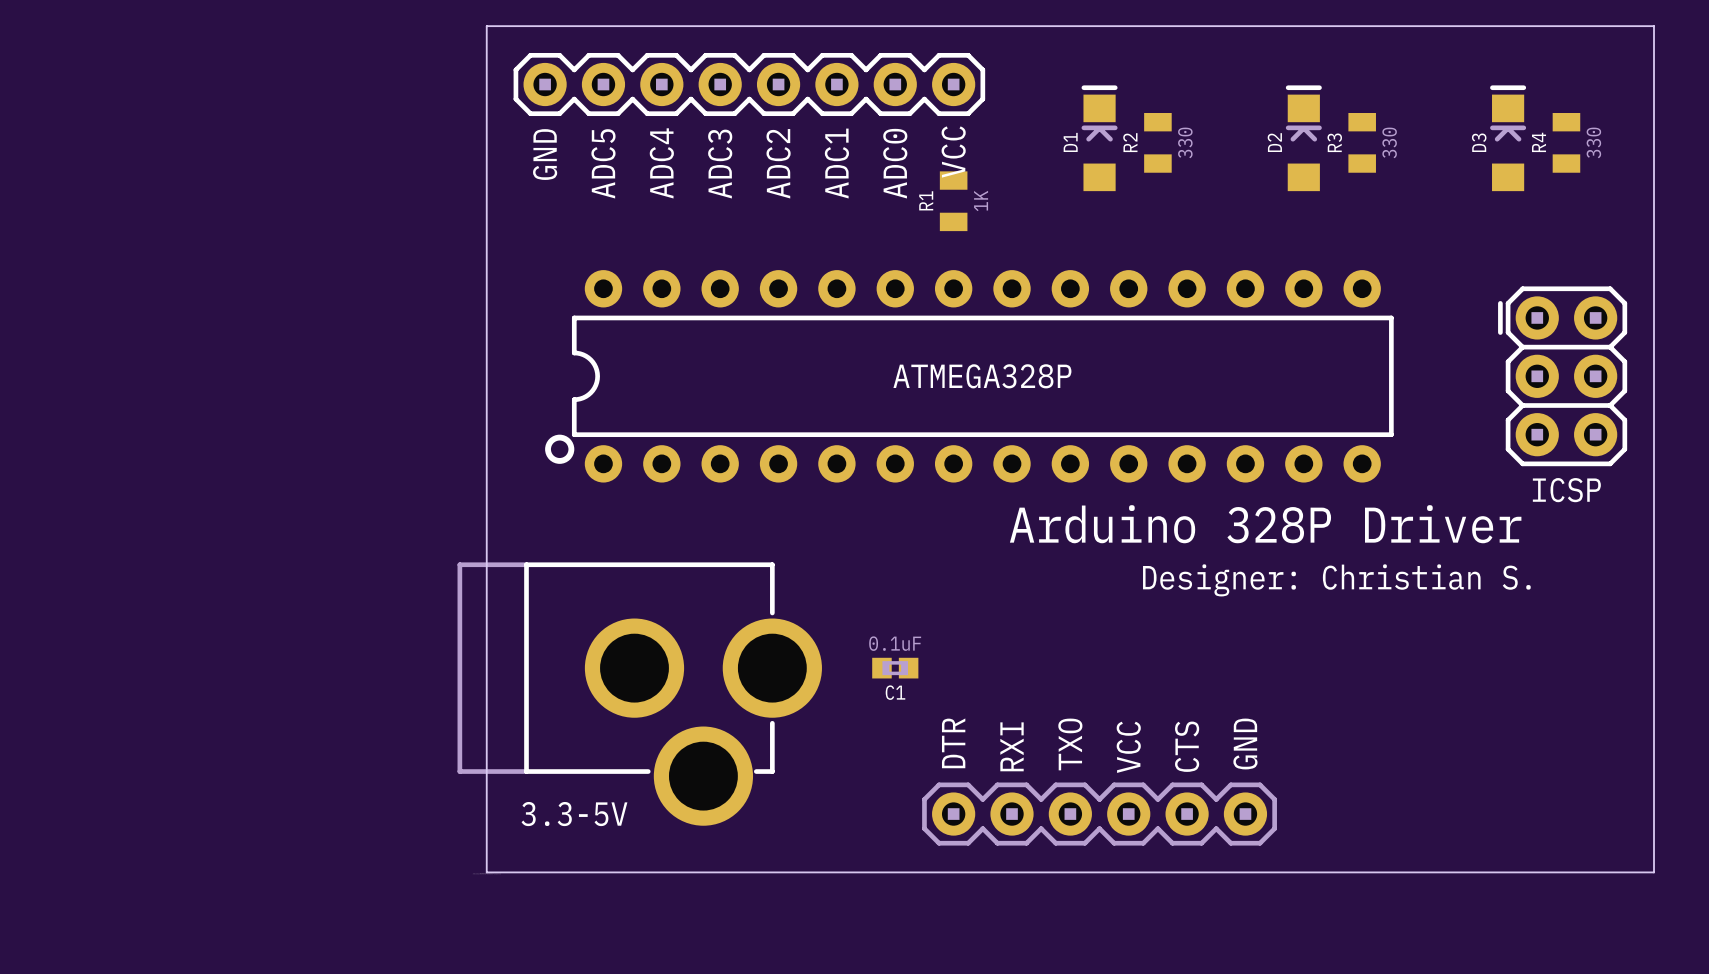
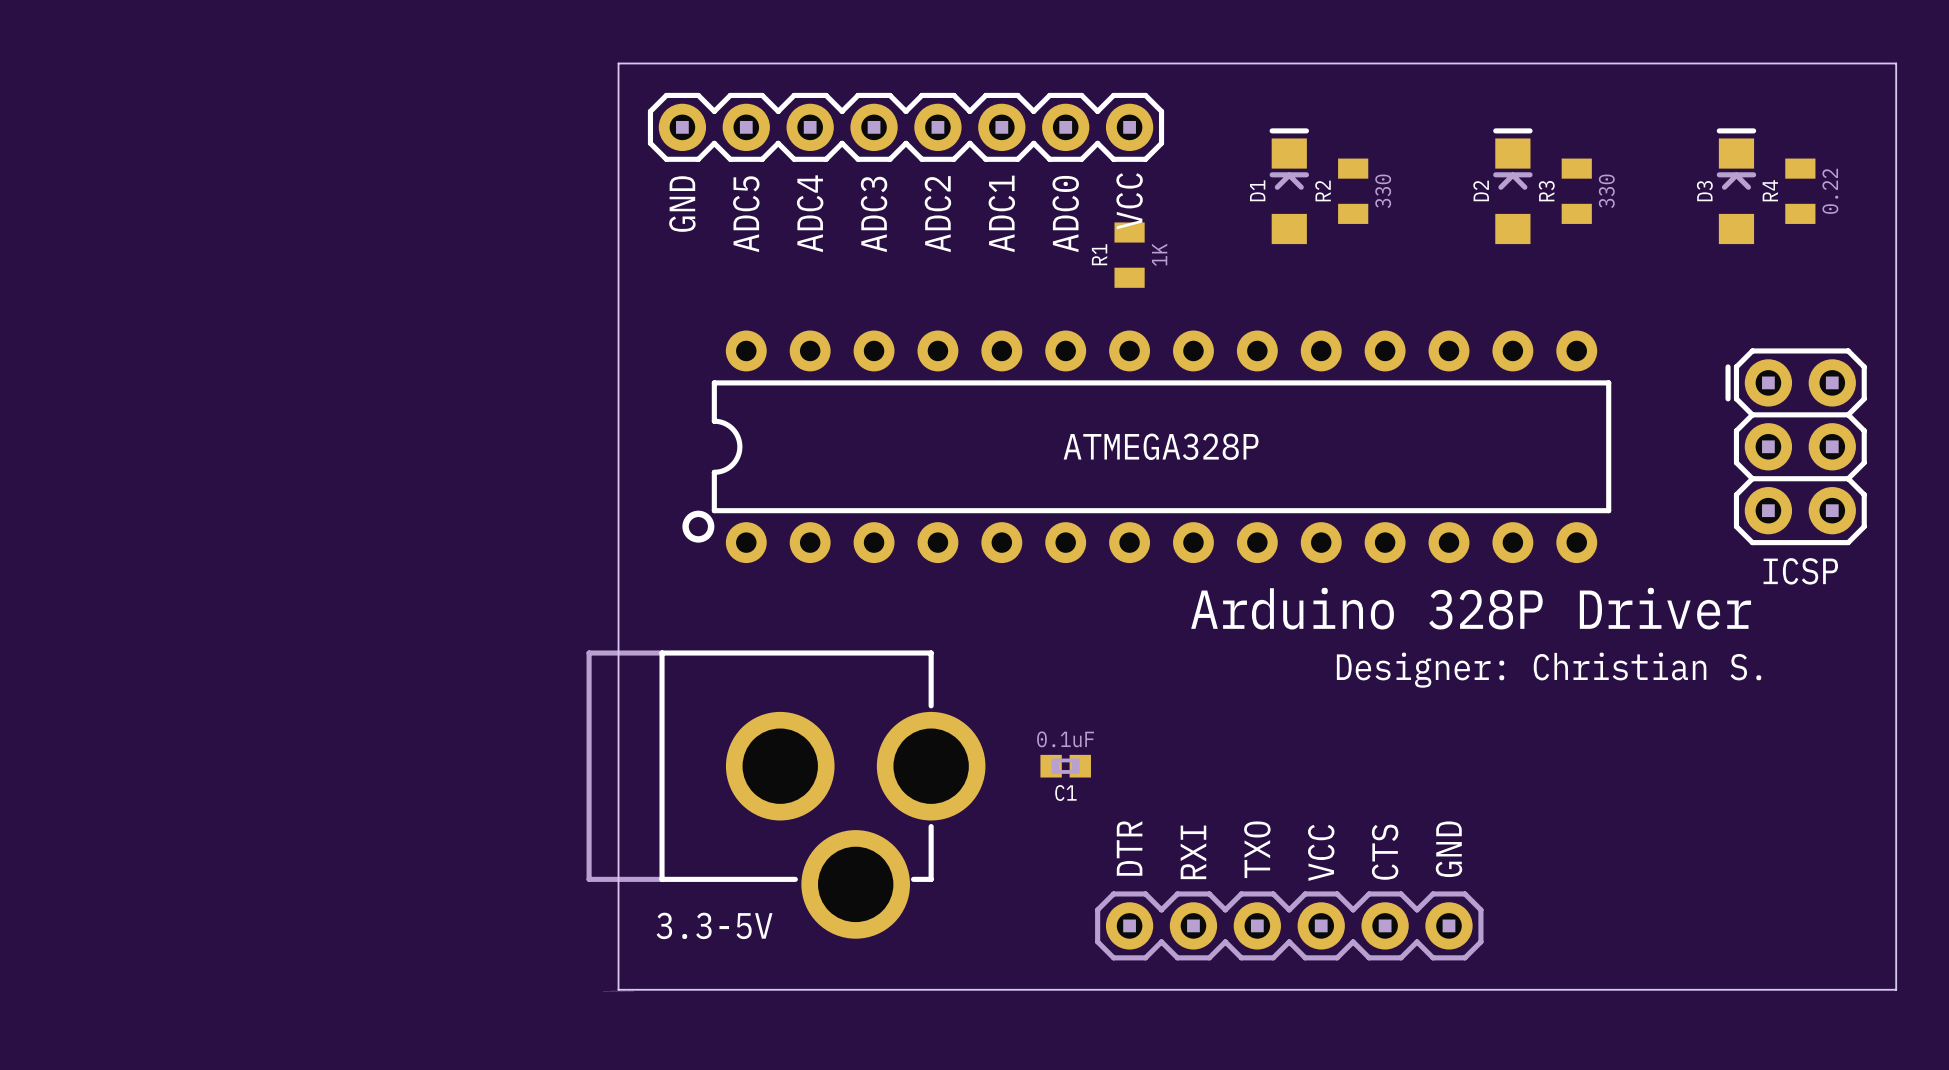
R4 value: 330 (1593, 142) -> 0.22 (1830, 191)

